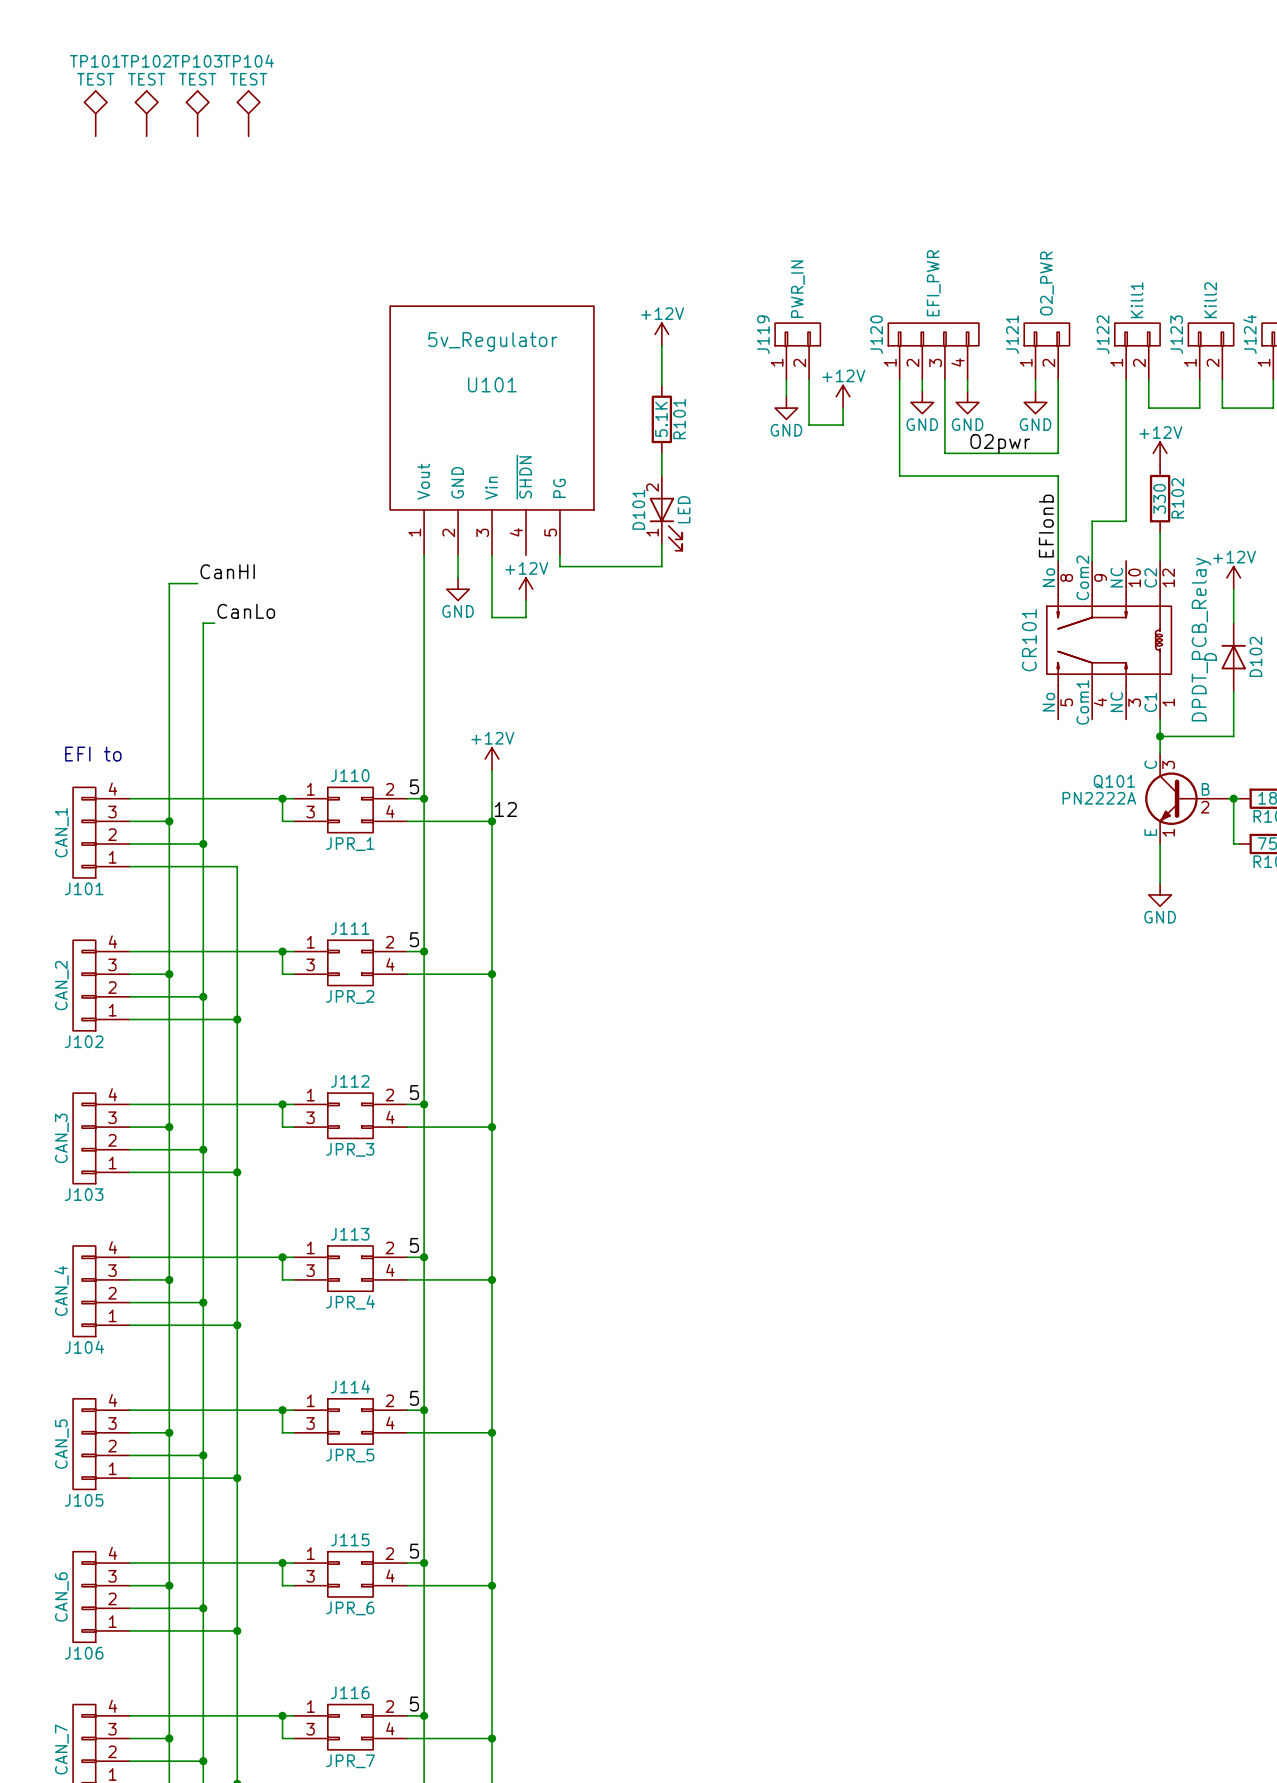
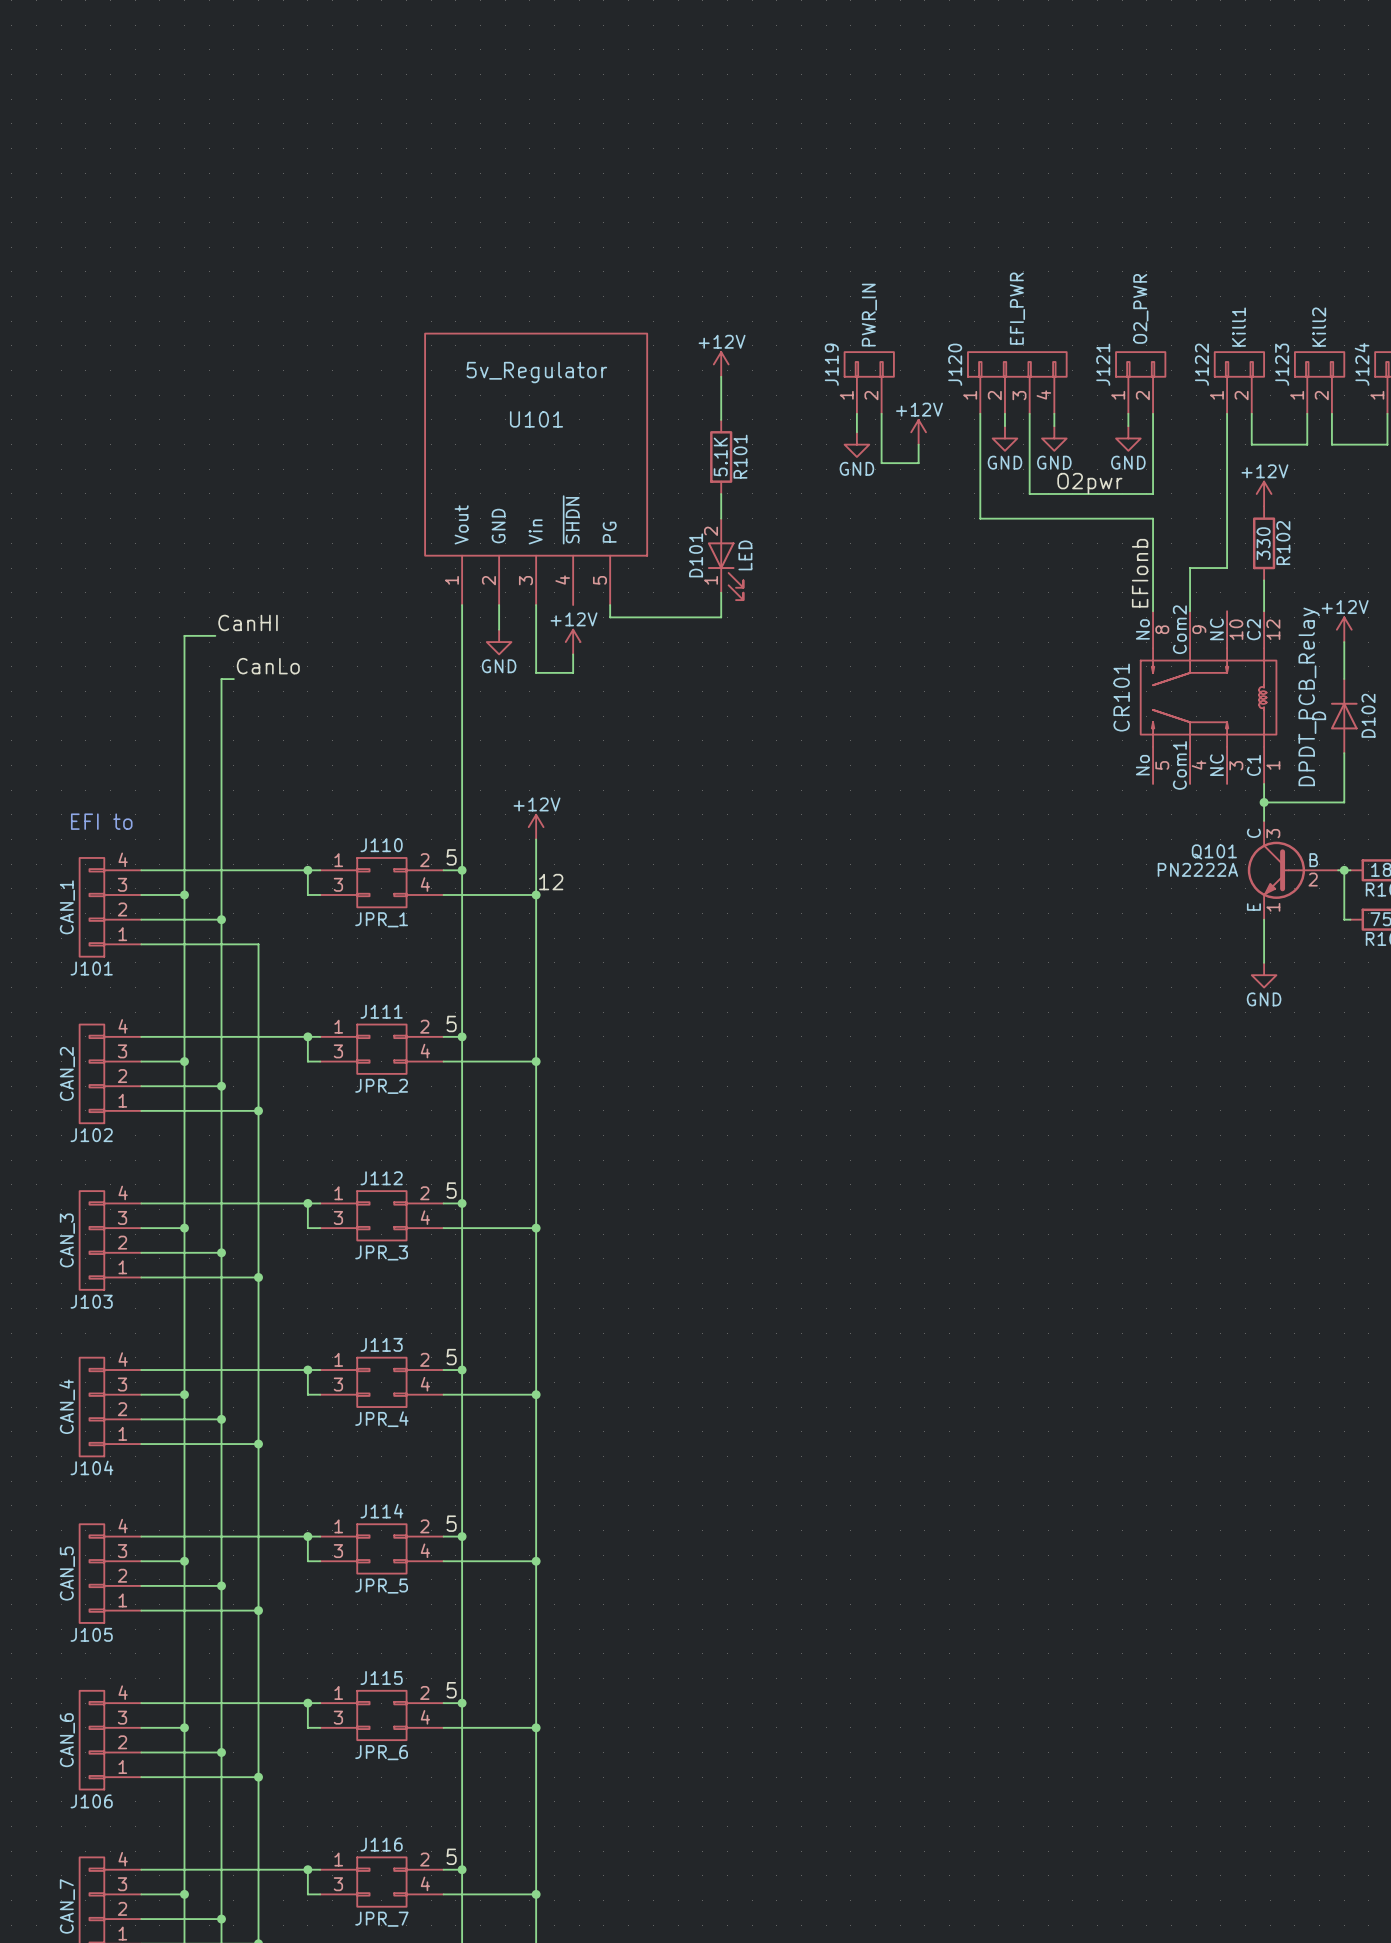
TP101: TEST (95, 113) -> none
TP102: TEST (146, 113) -> none
TP103: TEST (197, 113) -> none
TP104: TEST (248, 113) -> none

